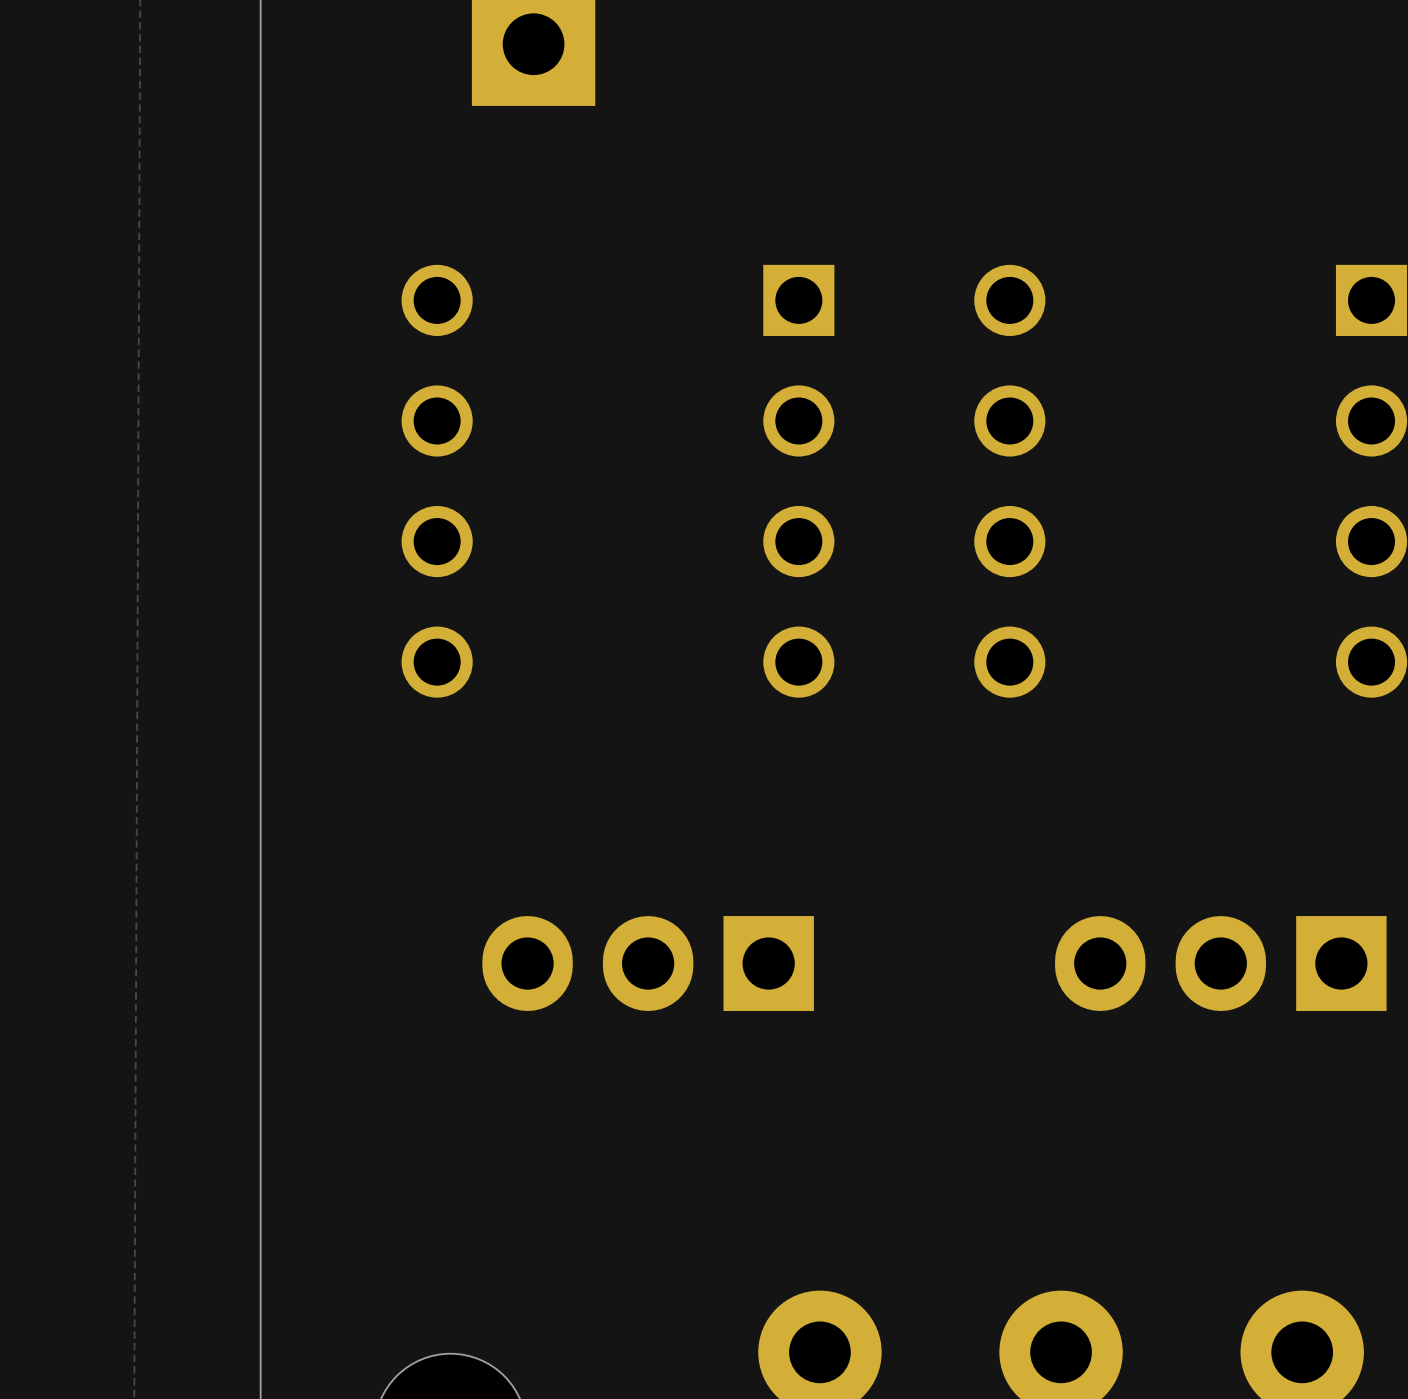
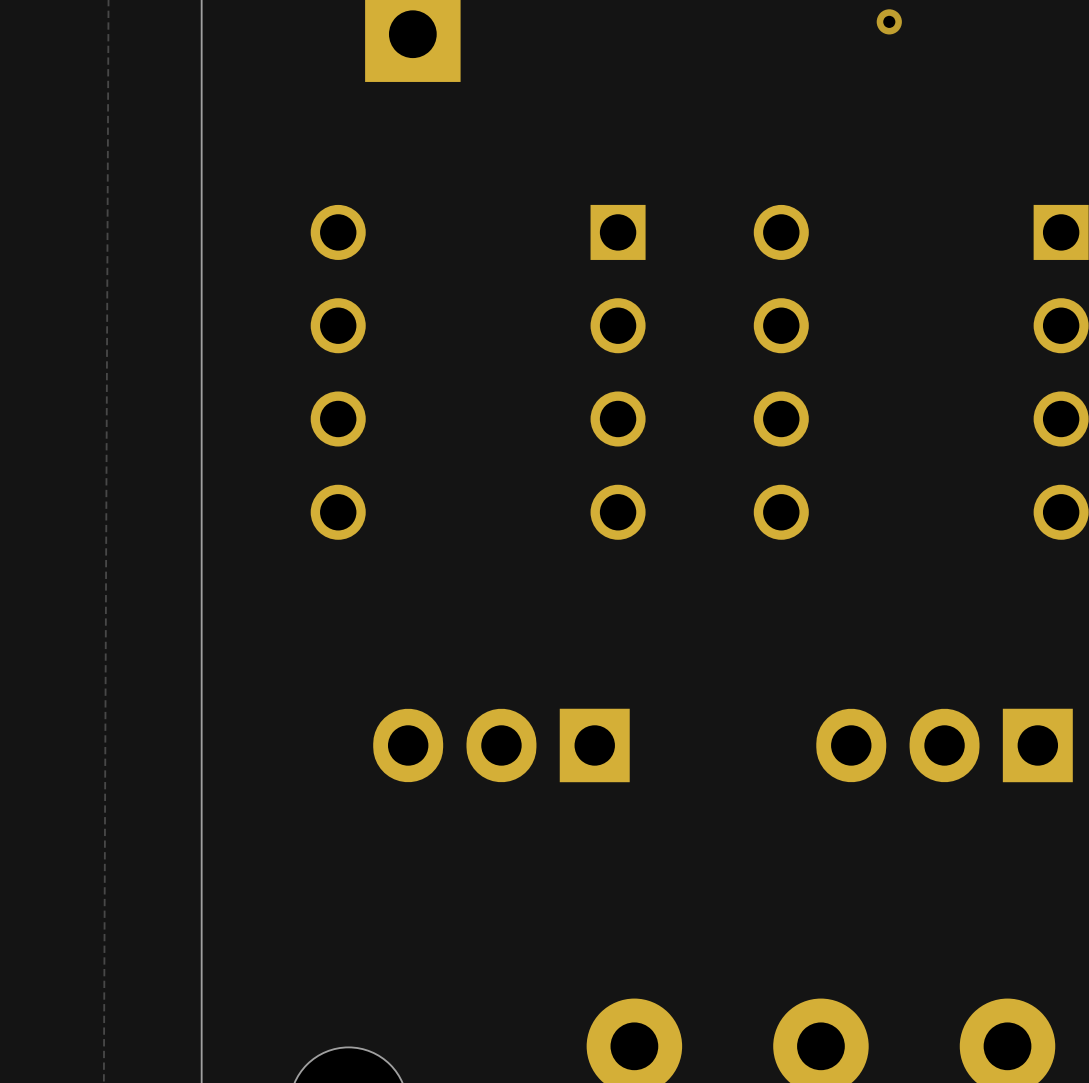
via: none -> (889, 21)

